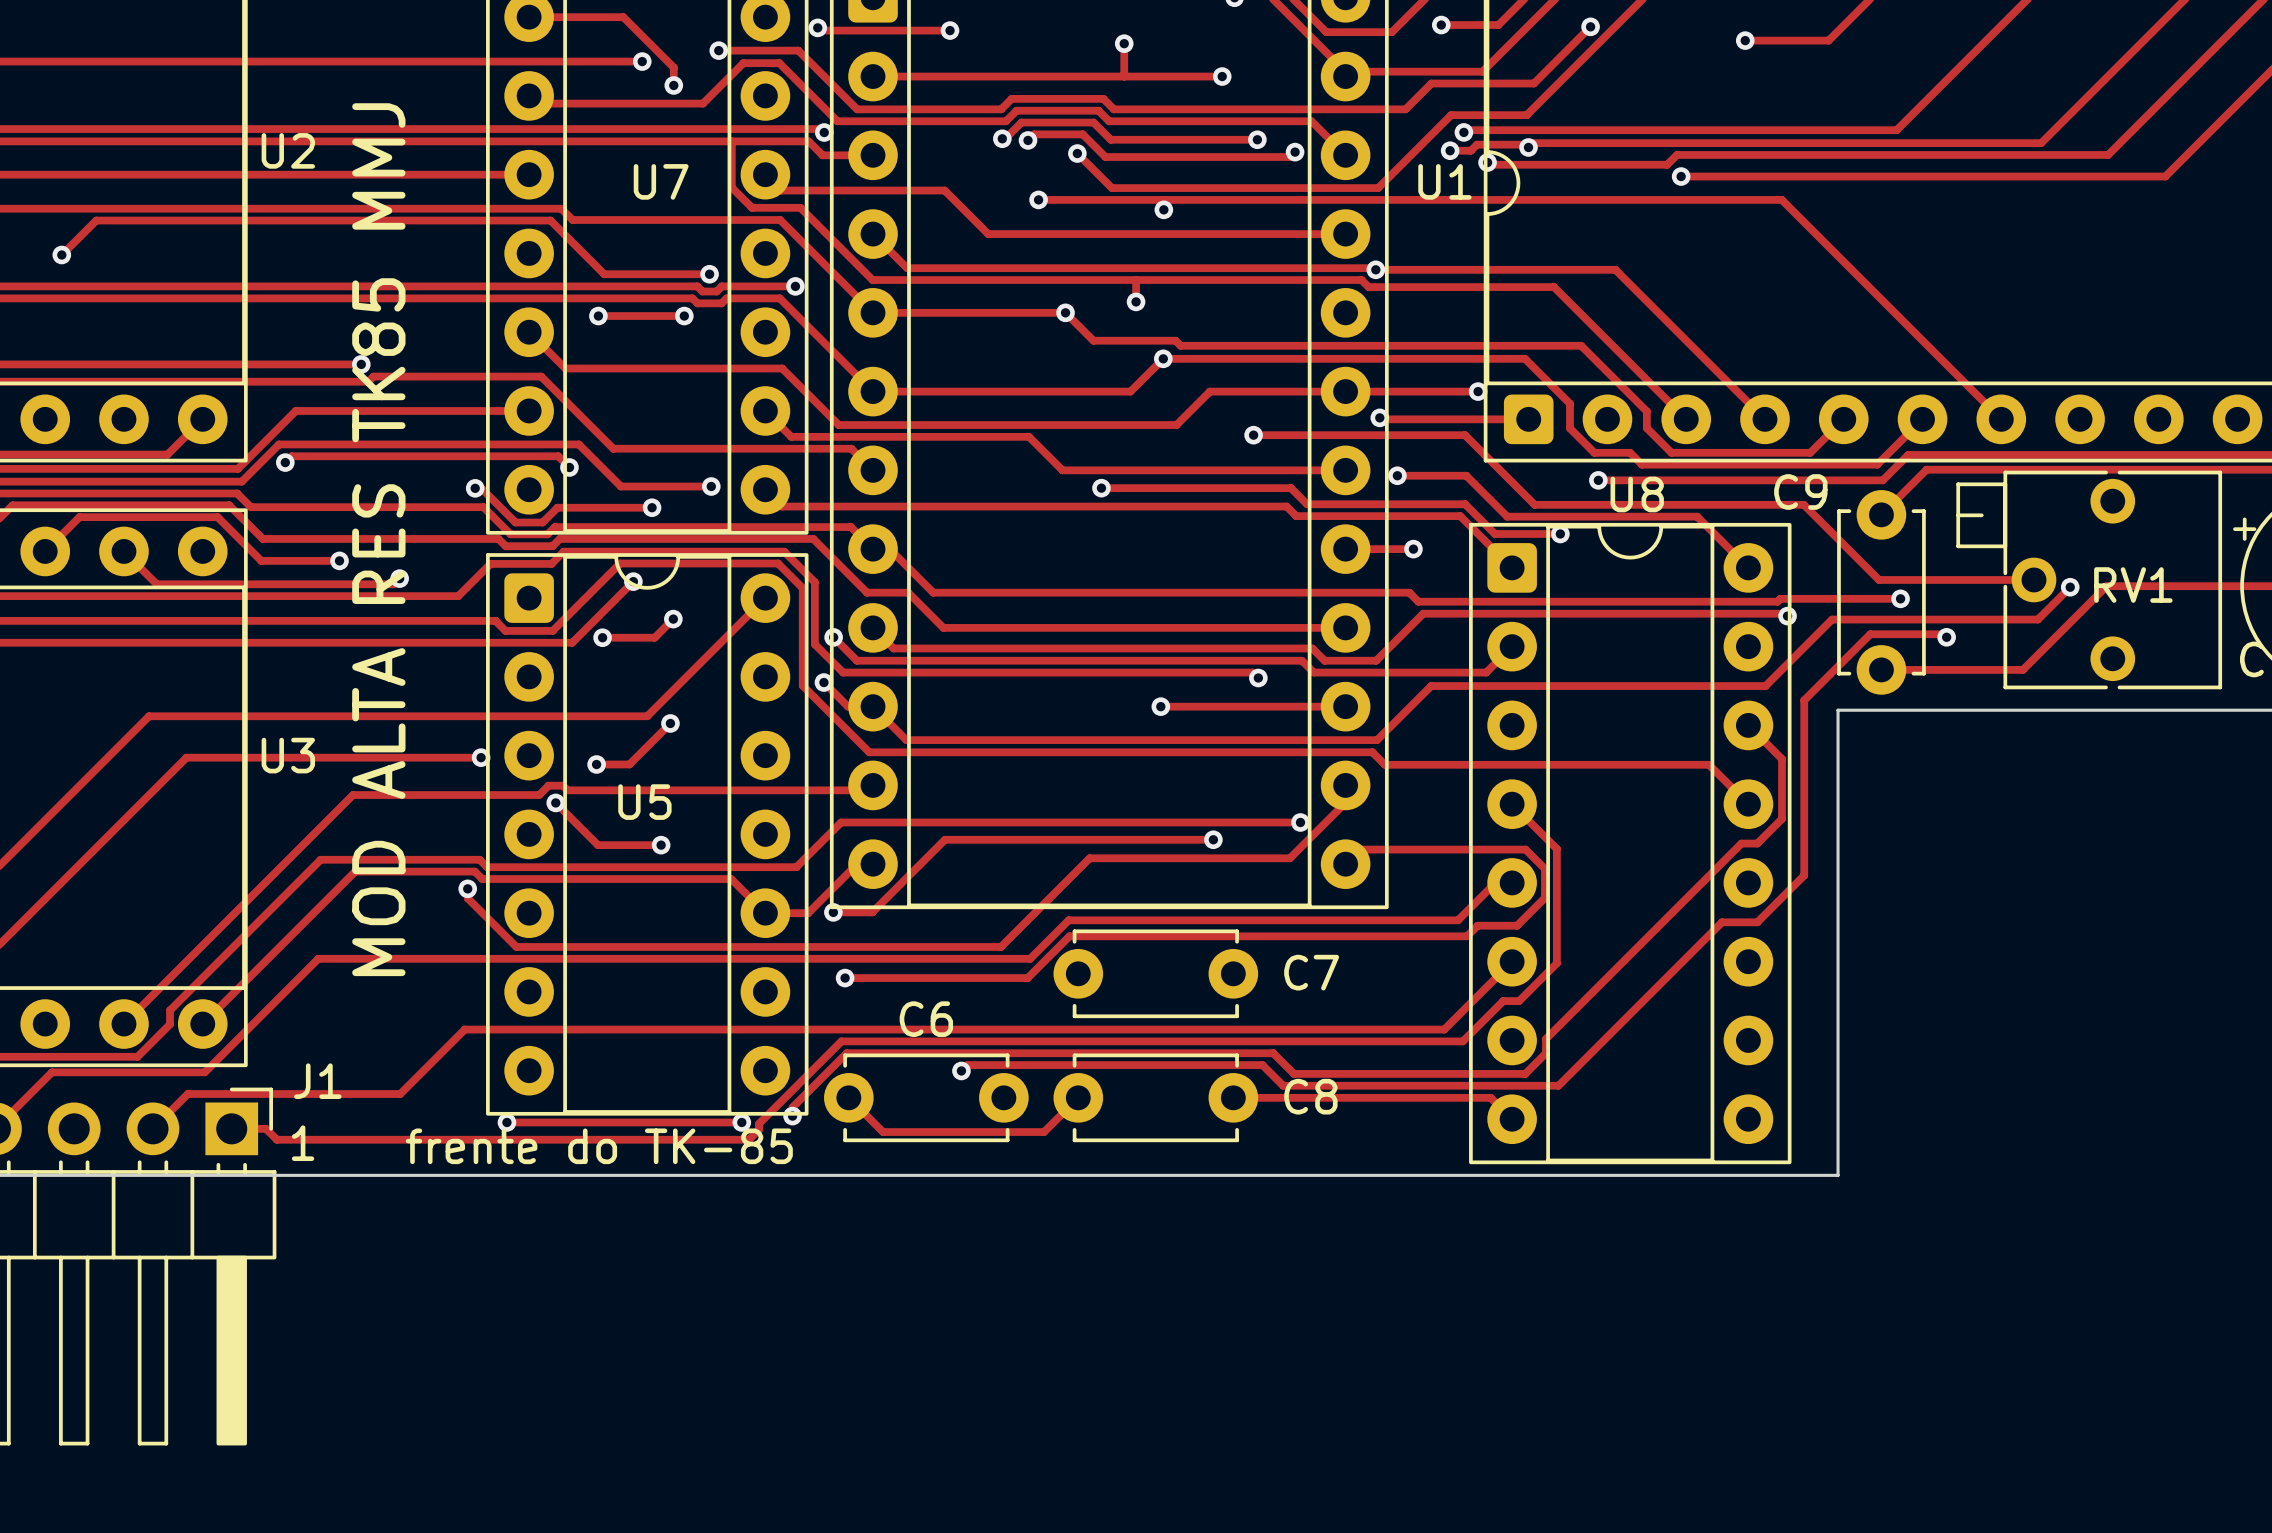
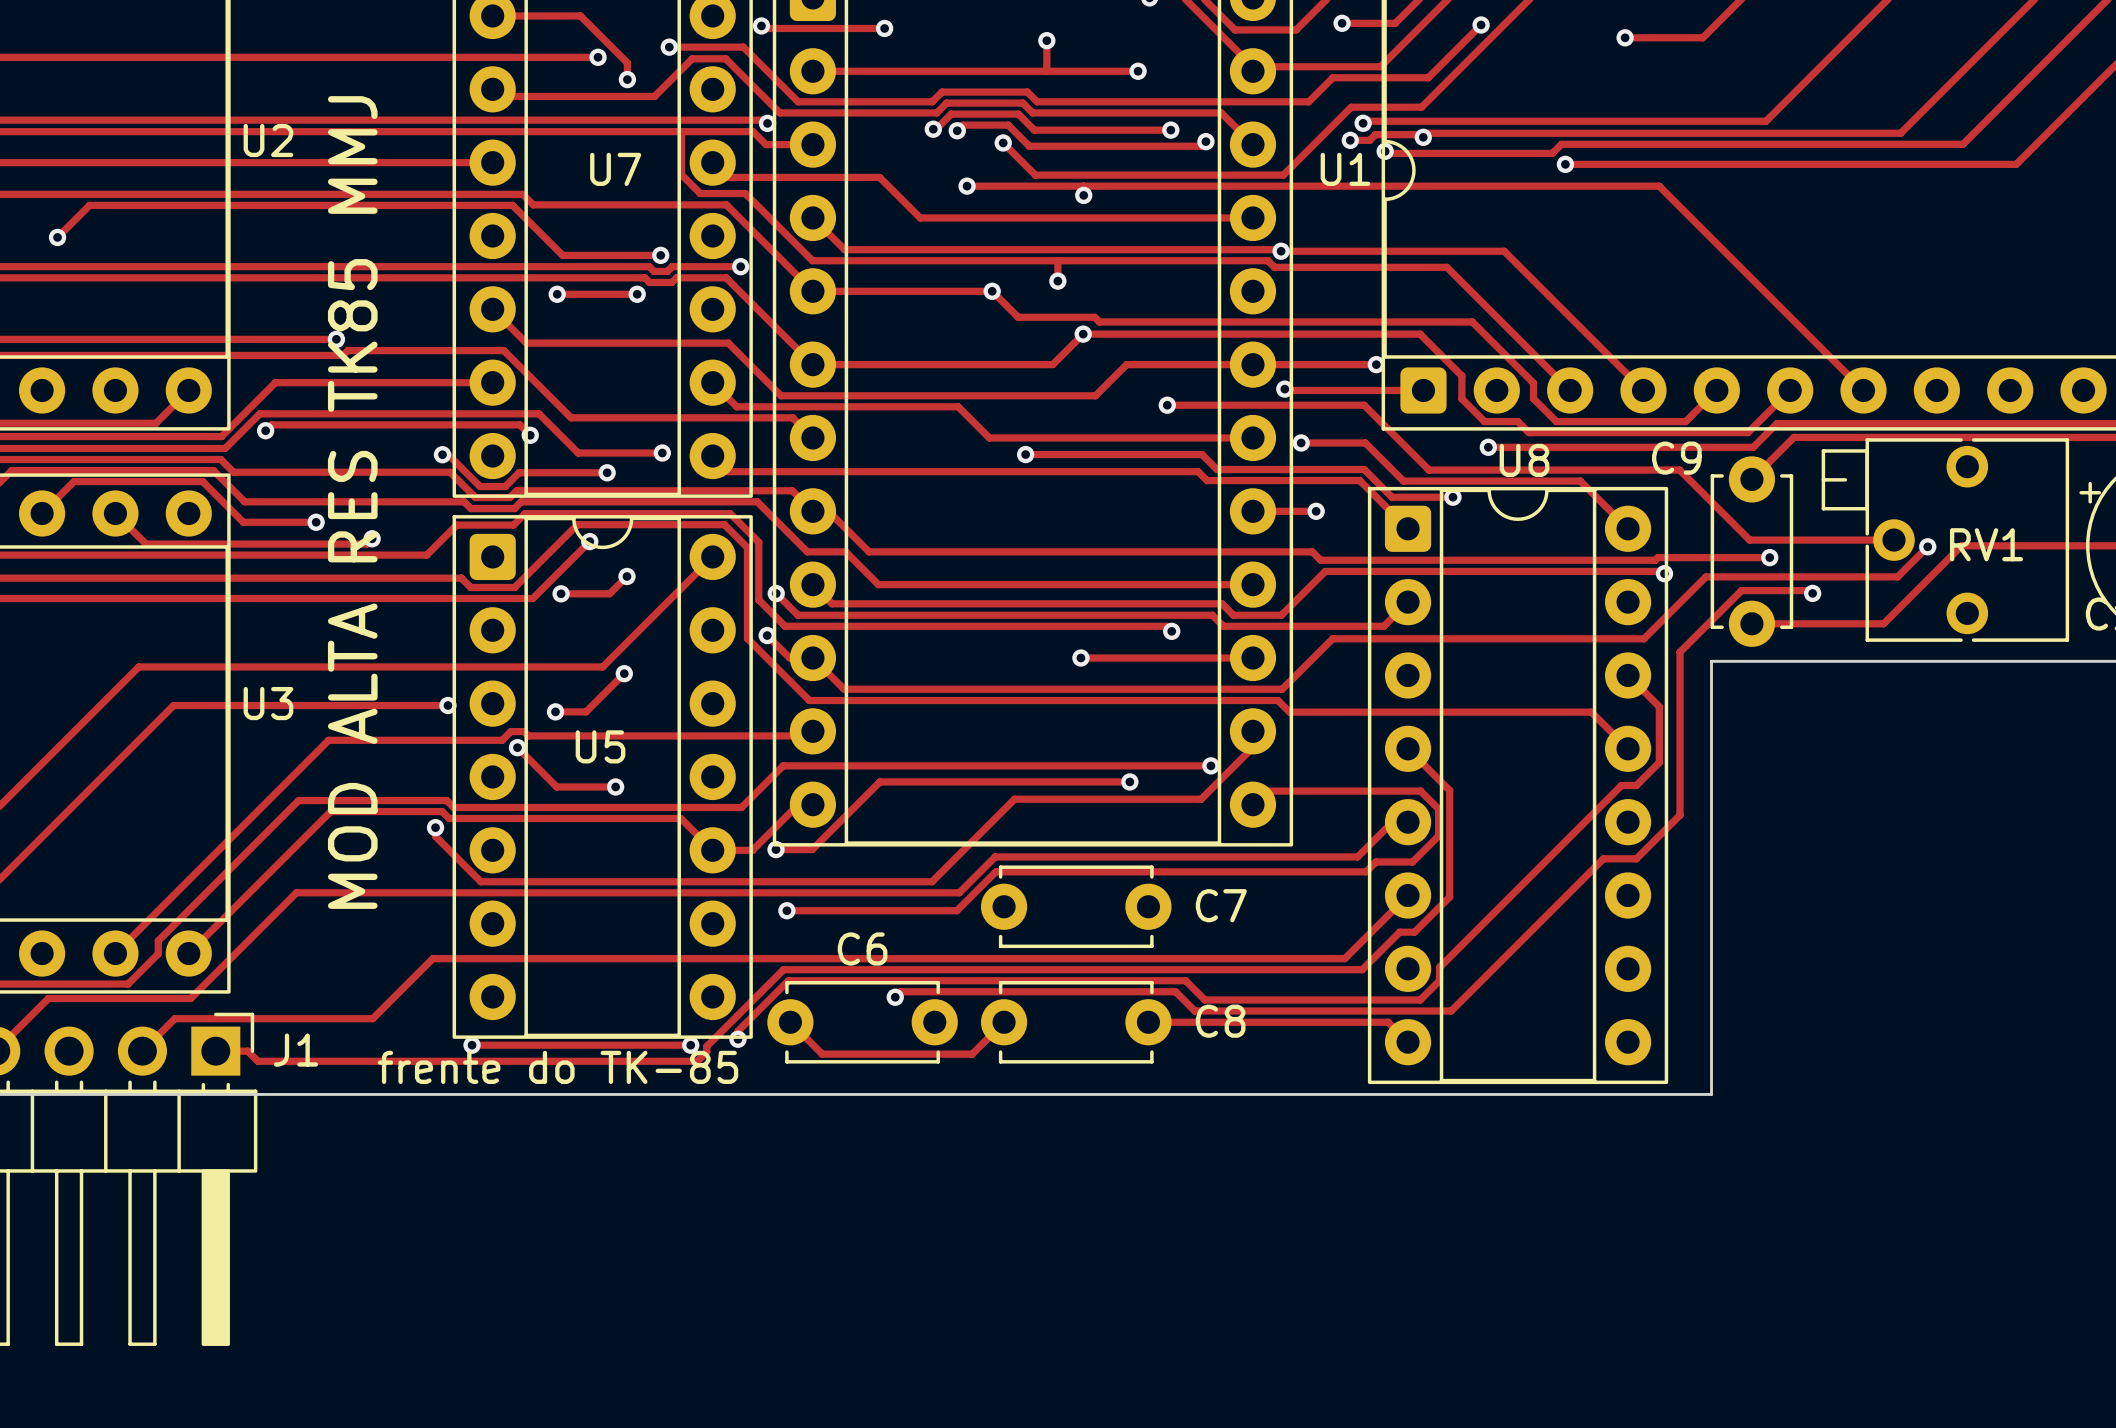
J1 name position: J1 (317, 1081) -> J1 (295, 1050)
text: 1 (303, 1143) -> none

